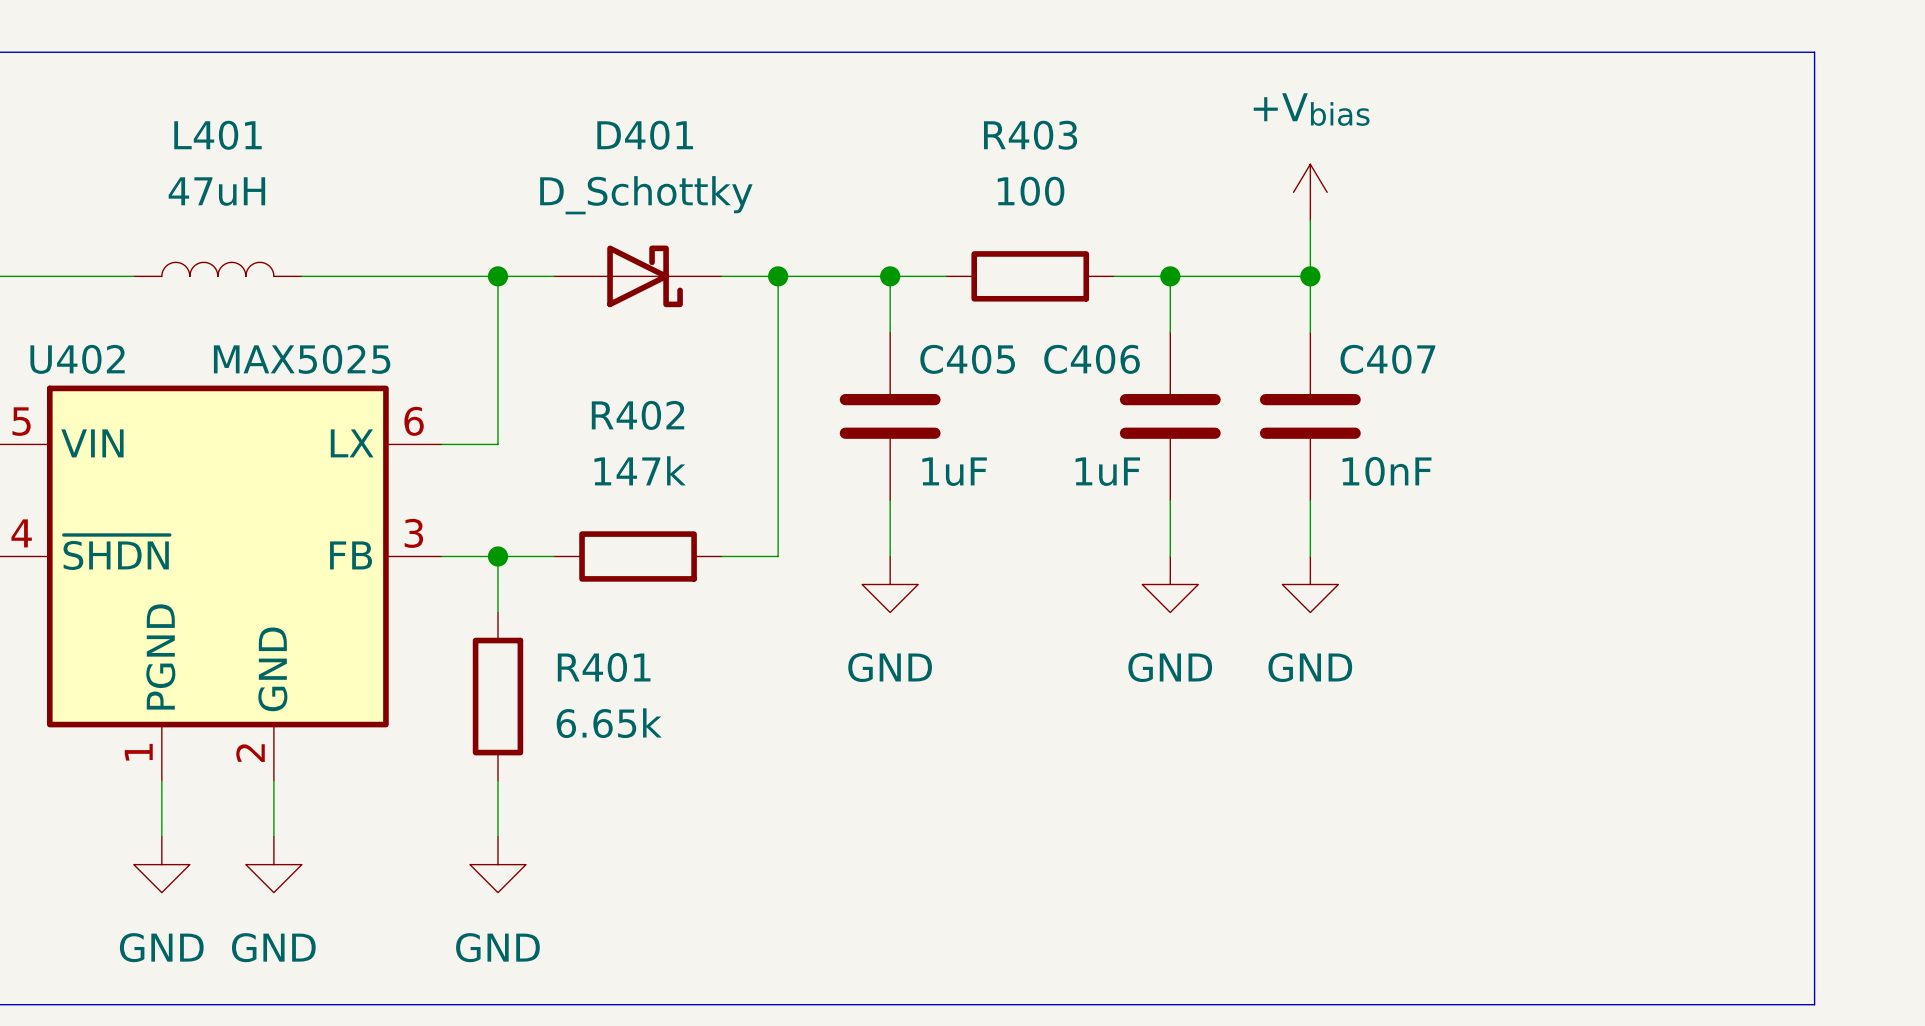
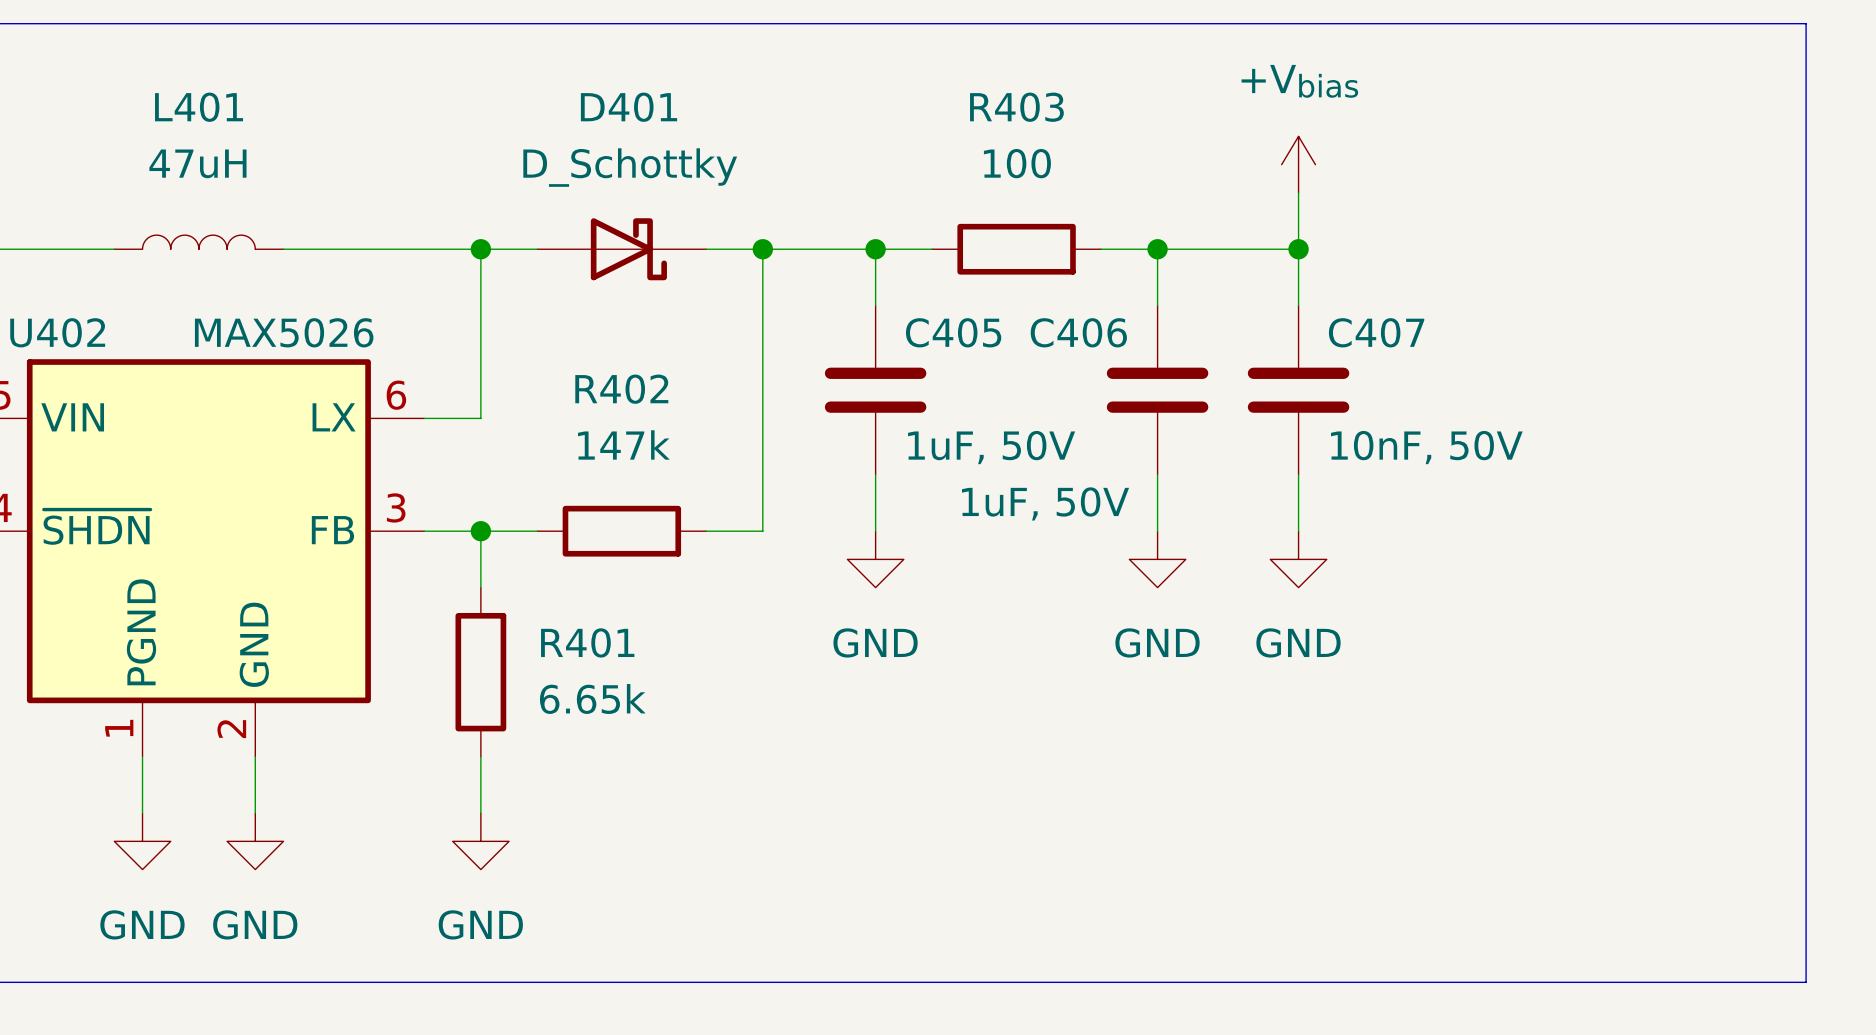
U402 value: MAX5025 (302, 359) -> MAX5026 (284, 332)
C405 value: 1uF (954, 471) -> 1uF, 50V (991, 447)
C406 value: 1uF (1107, 471) -> 1uF, 50V (1045, 503)
C407 value: 10nF (1387, 471) -> 10nF, 50V (1426, 447)

